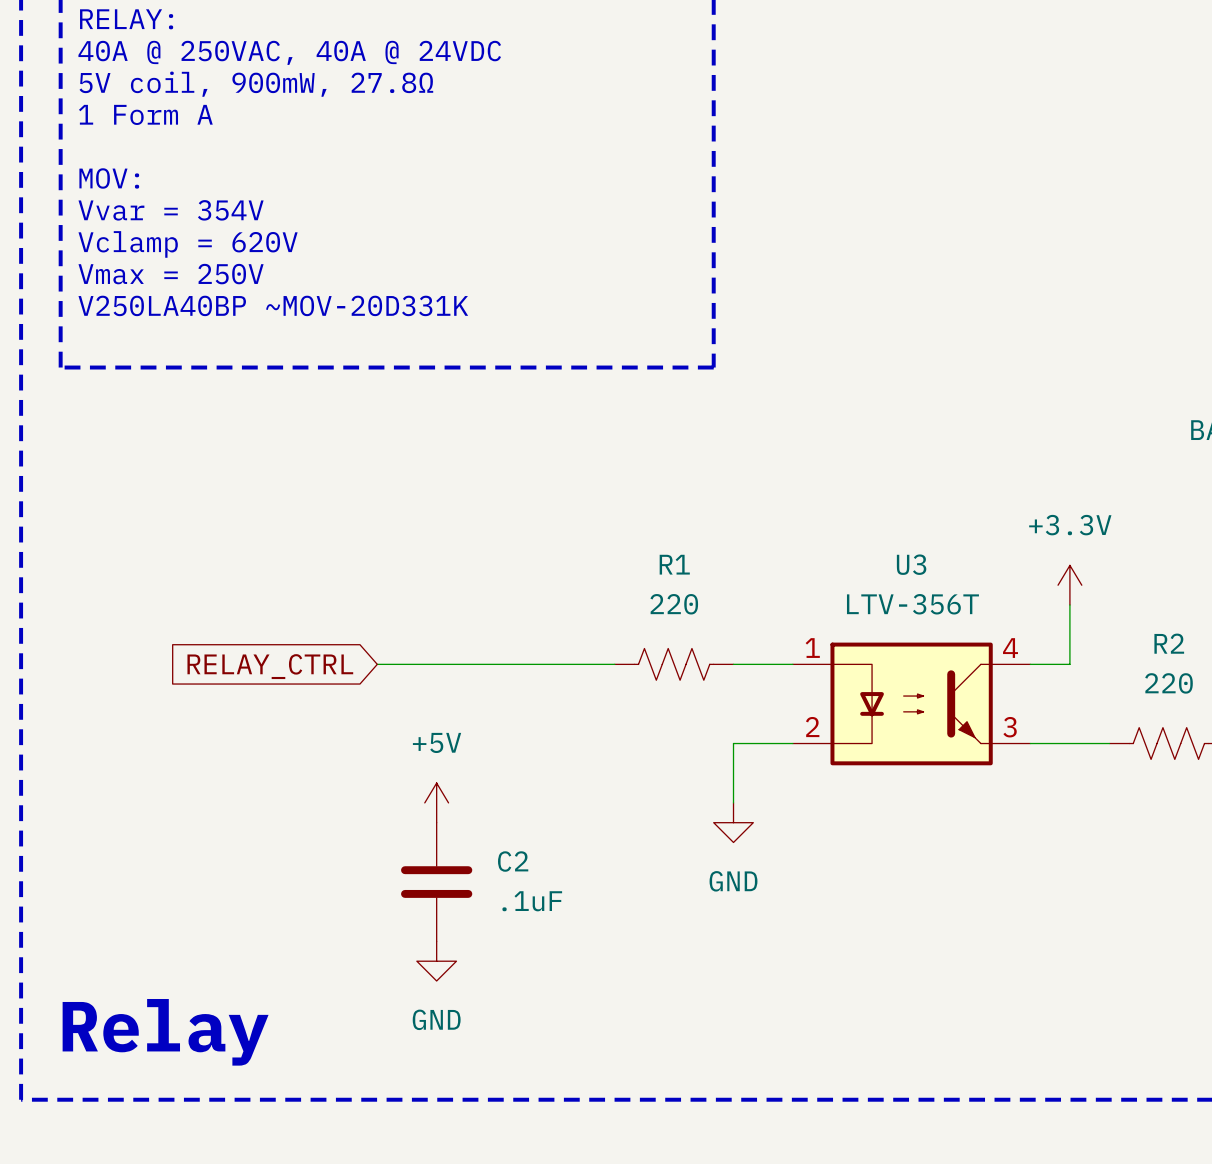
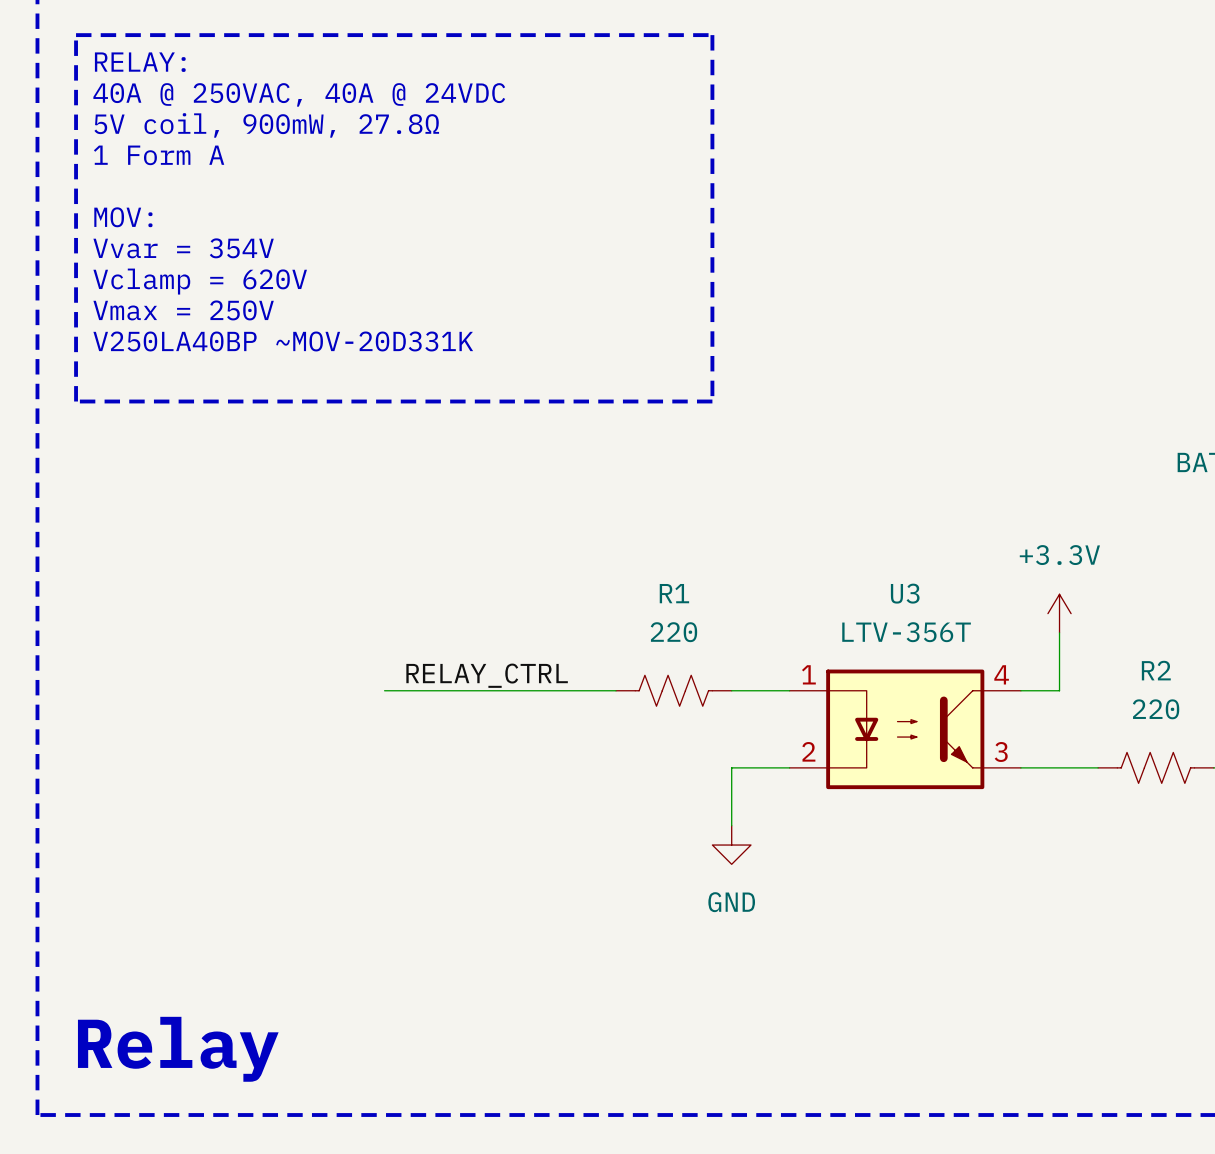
label: none -> RELAY_CTRL (487, 675)
global label: RELAY_CTRL (270, 666) -> none
power symbol: +5V (436, 802) -> none
C2: .1uF (436, 882) -> none
power symbol: GND (436, 961) -> none

